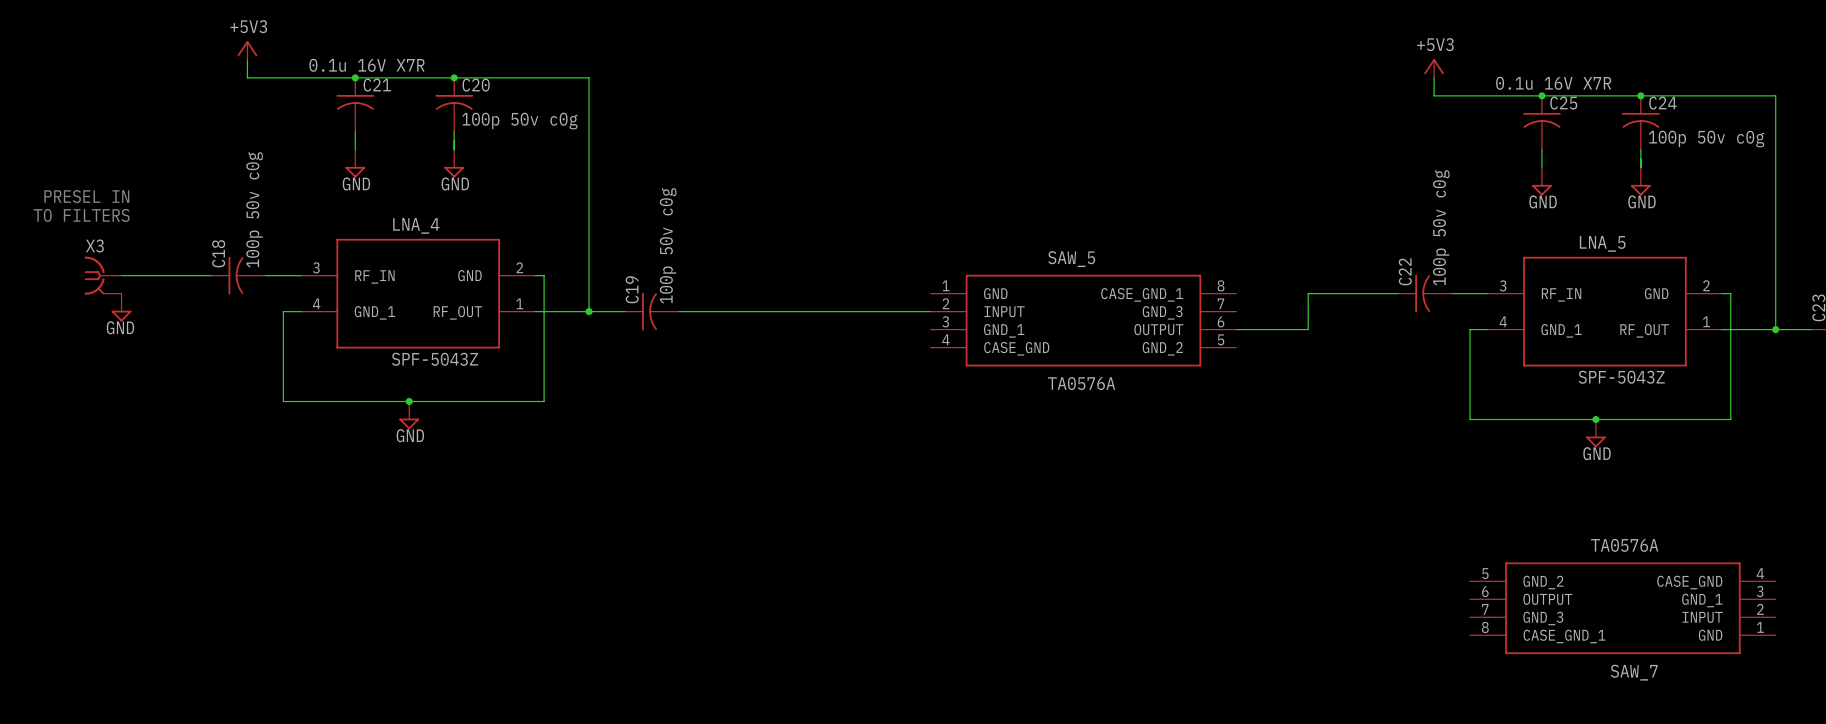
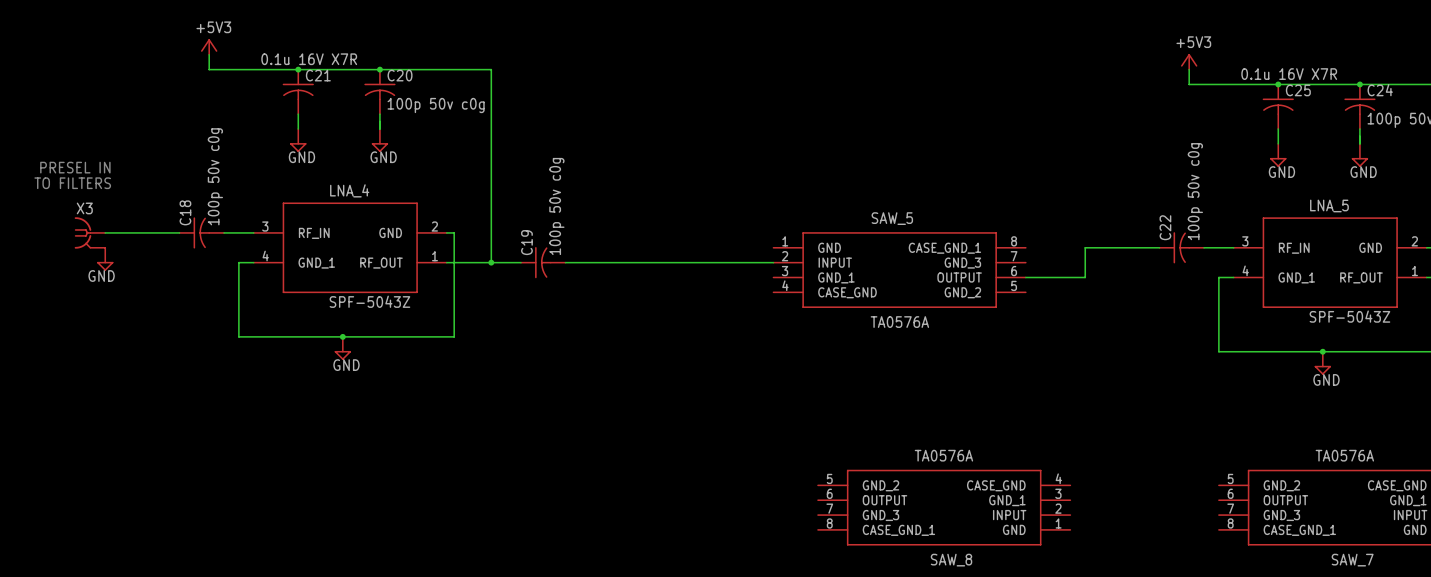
SAW_8: none -> TA0576A (944, 507)

